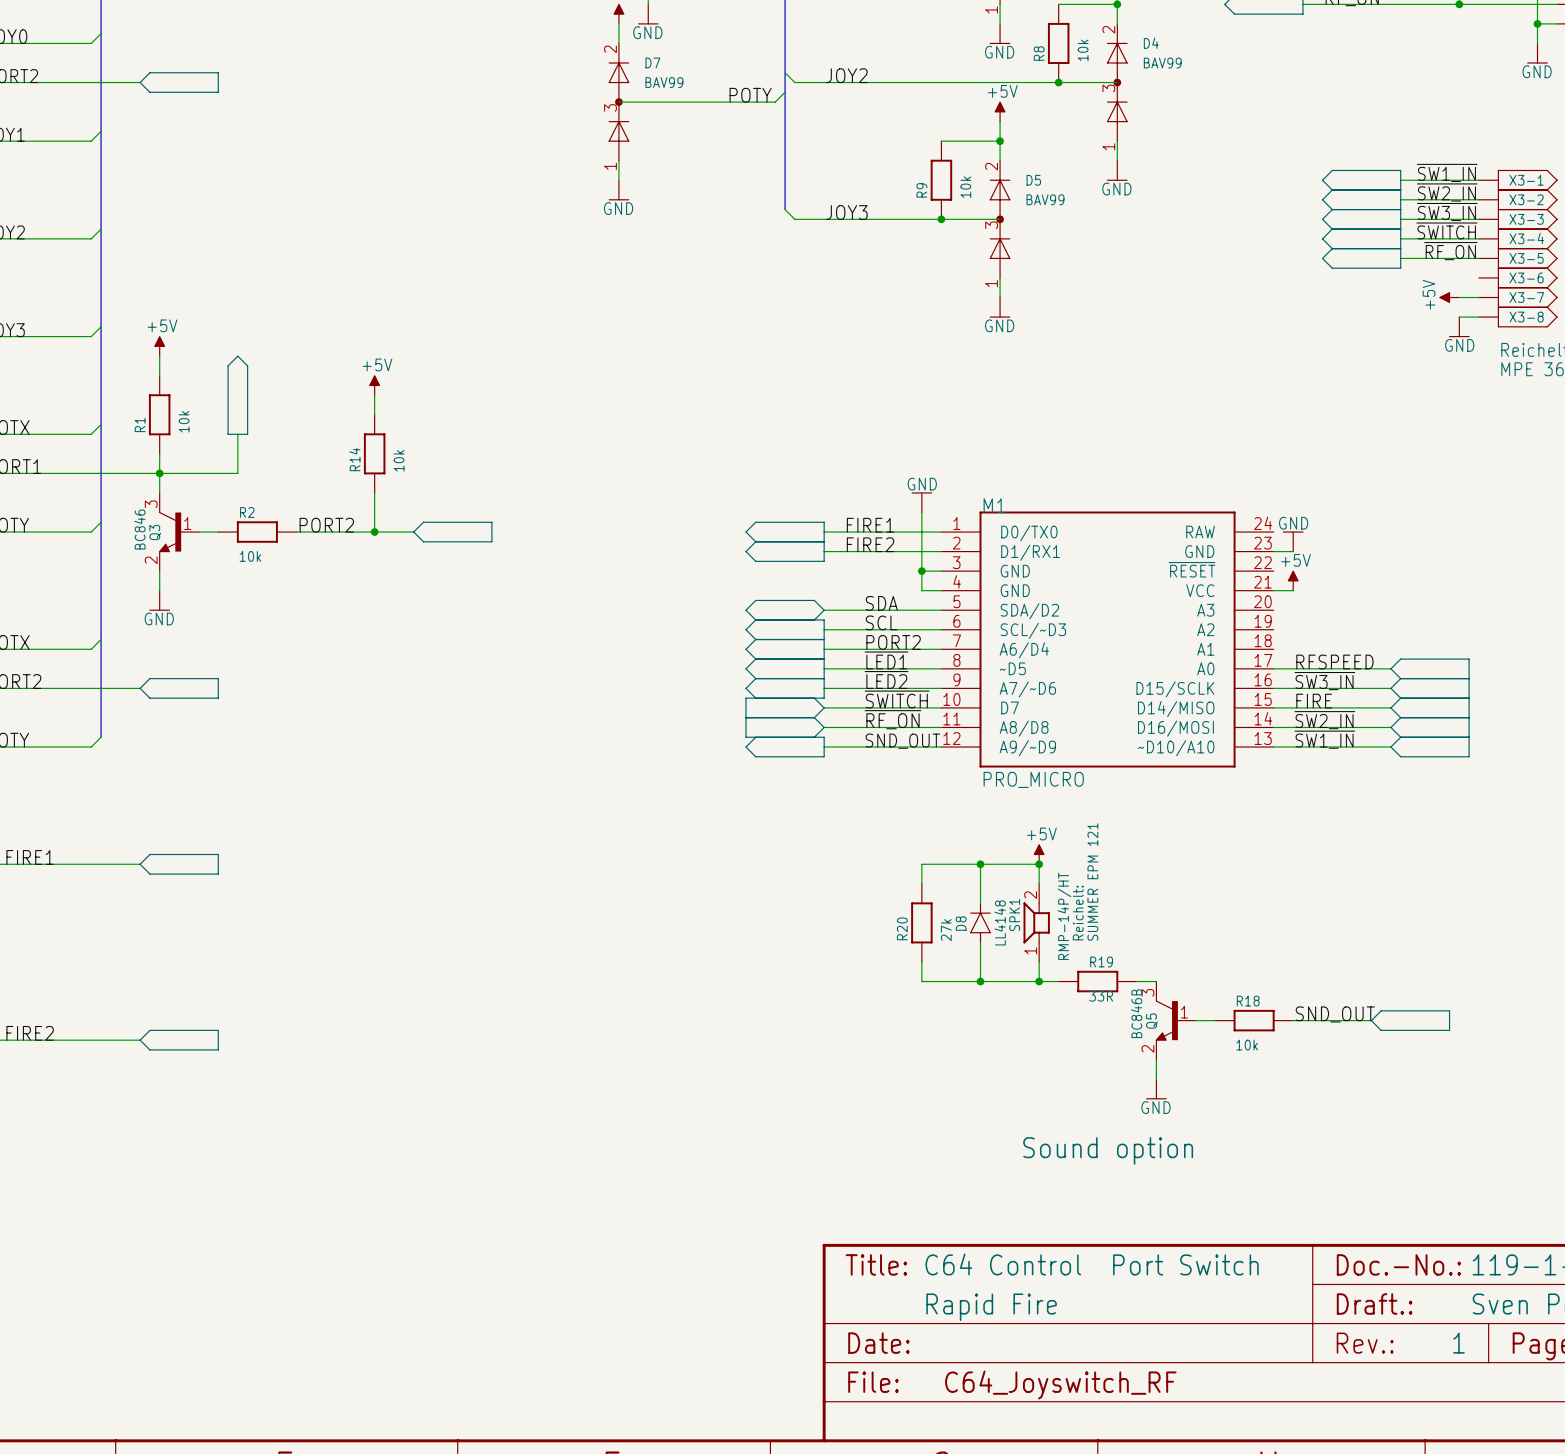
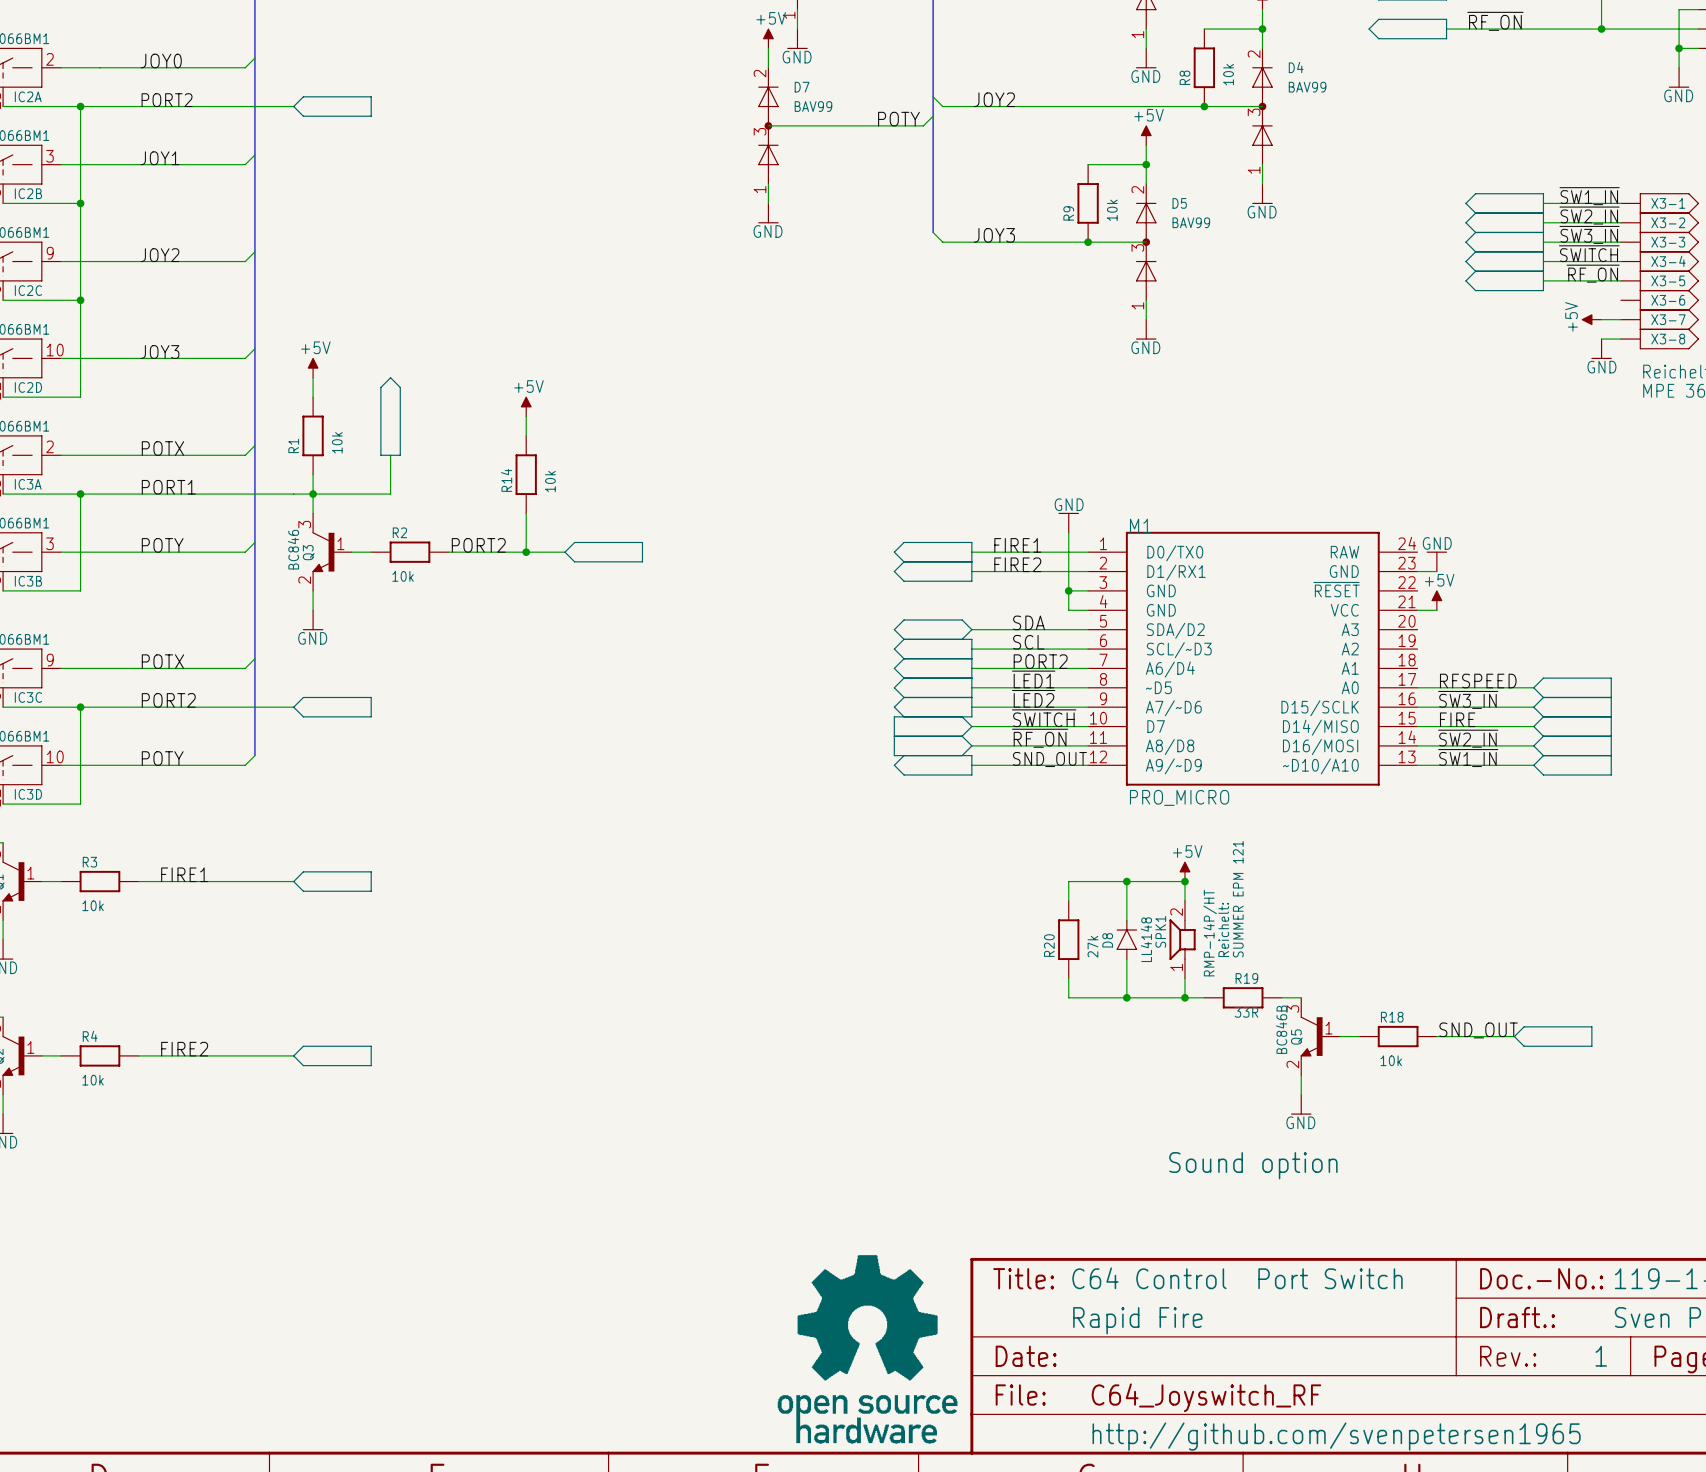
part: none -> (867, 1349)
text: none -> http://github.com/svenpetersen1965 (1336, 1436)

